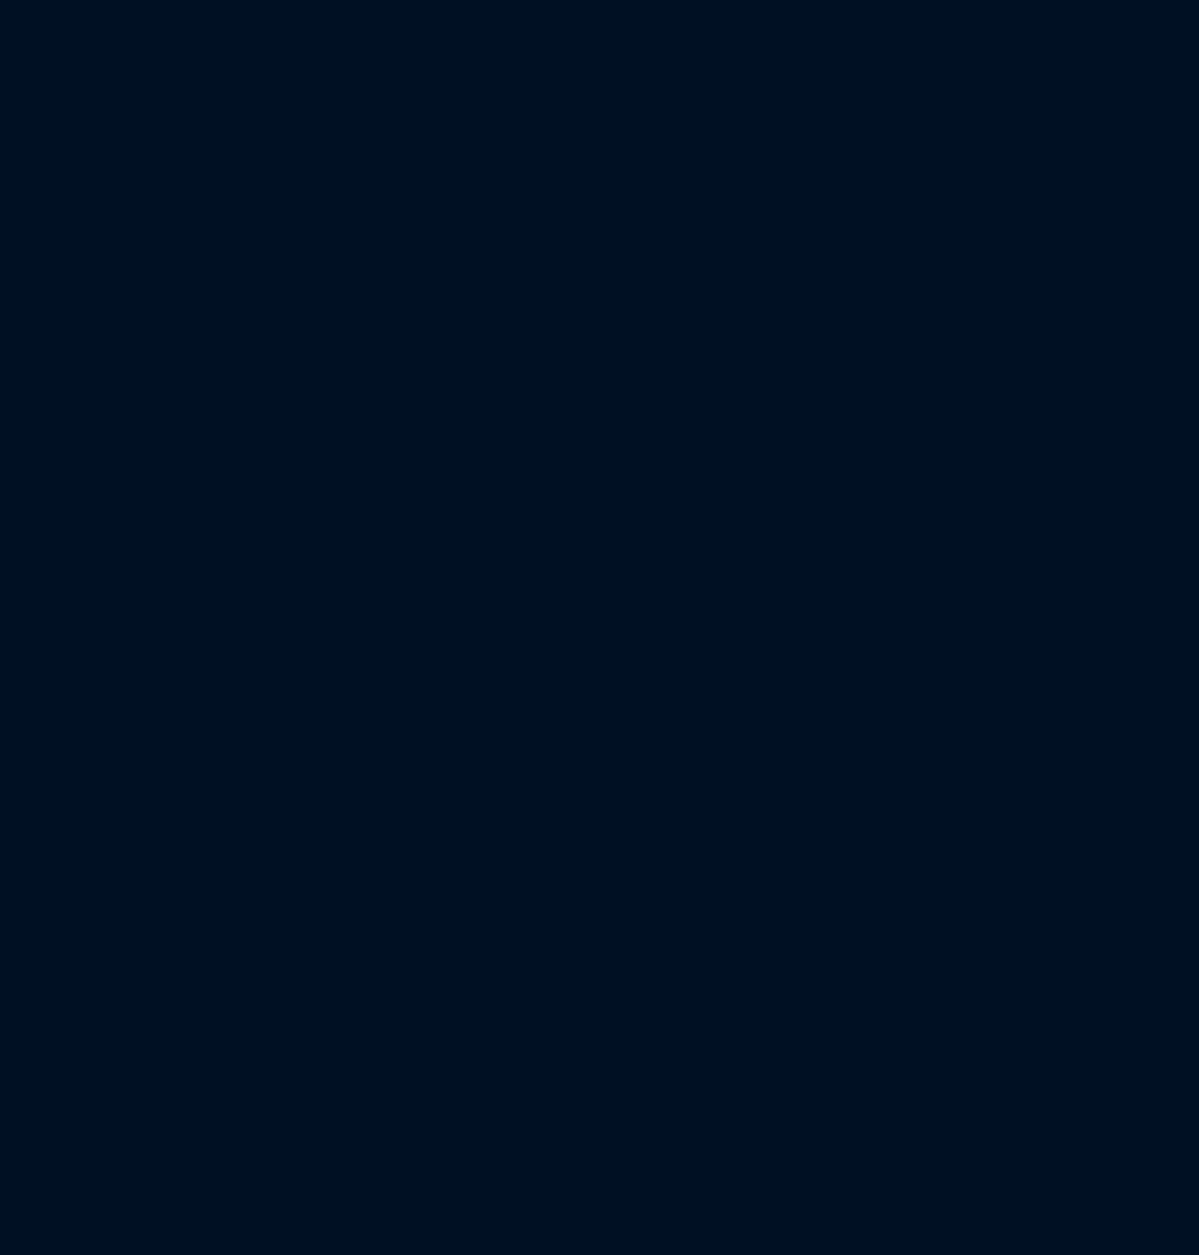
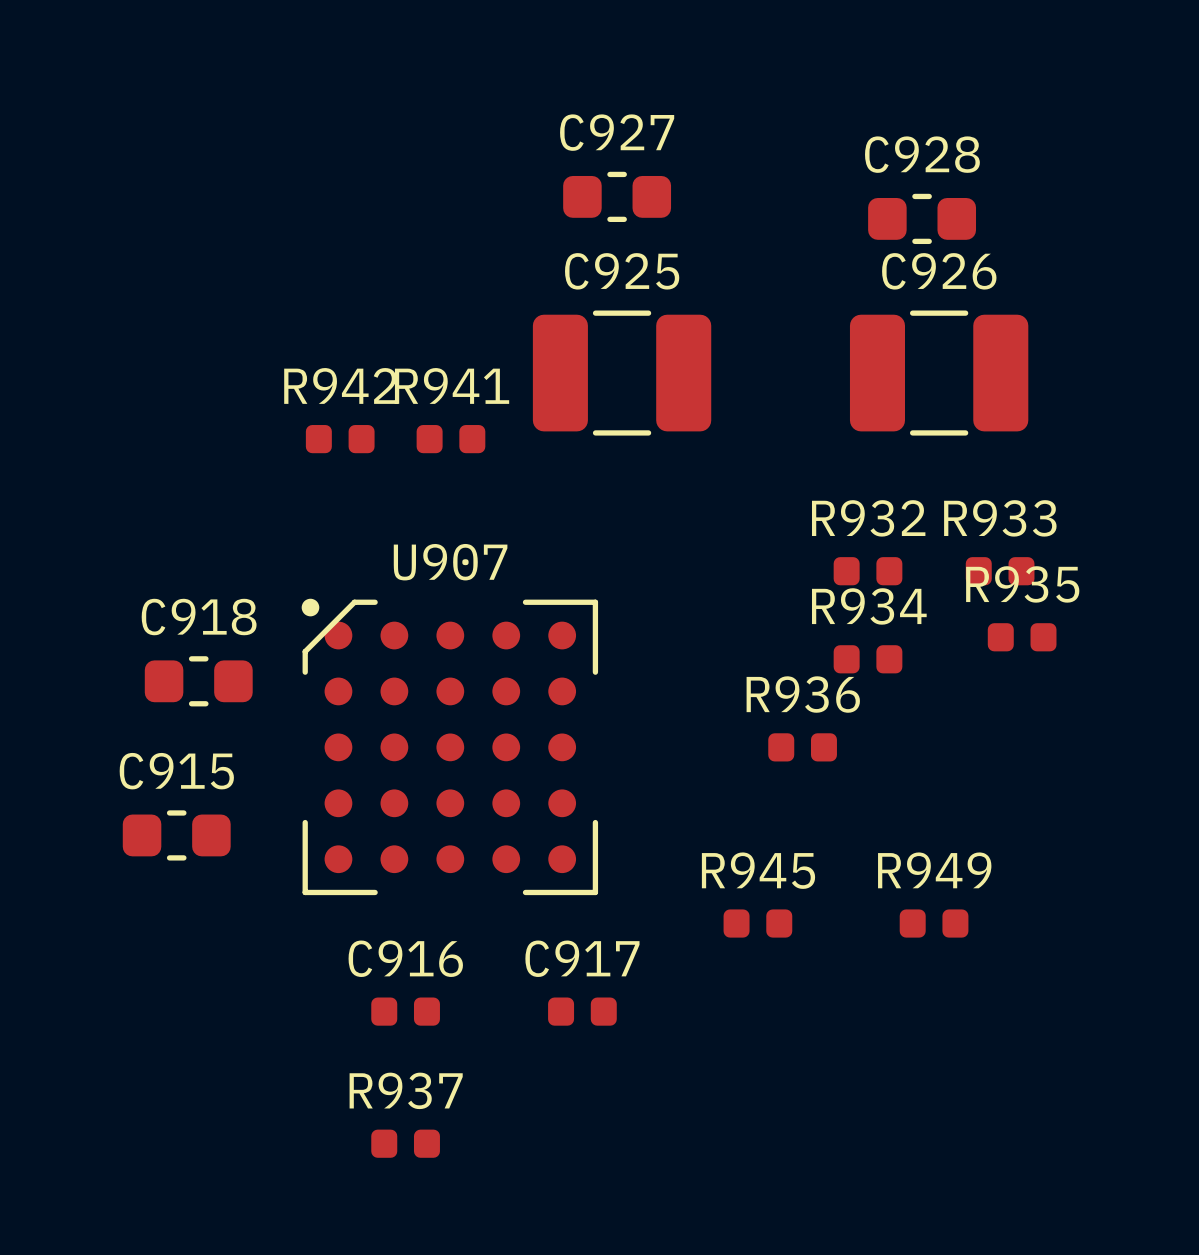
C927: none -> (617, 196)
C928: none -> (922, 218)
C925: none -> (622, 373)
C926: none -> (939, 373)
R942: none -> (340, 439)
R941: none -> (450, 439)
R932: none -> (868, 571)
R933: none -> (1000, 571)
R935: none -> (1022, 637)
R934: none -> (868, 659)
C918: none -> (198, 681)
U907: none -> (449, 746)
R936: none -> (802, 747)
C915: none -> (176, 835)
R945: none -> (757, 923)
R949: none -> (934, 923)
C916: none -> (405, 1011)
C917: none -> (582, 1011)
R937: none -> (405, 1143)

